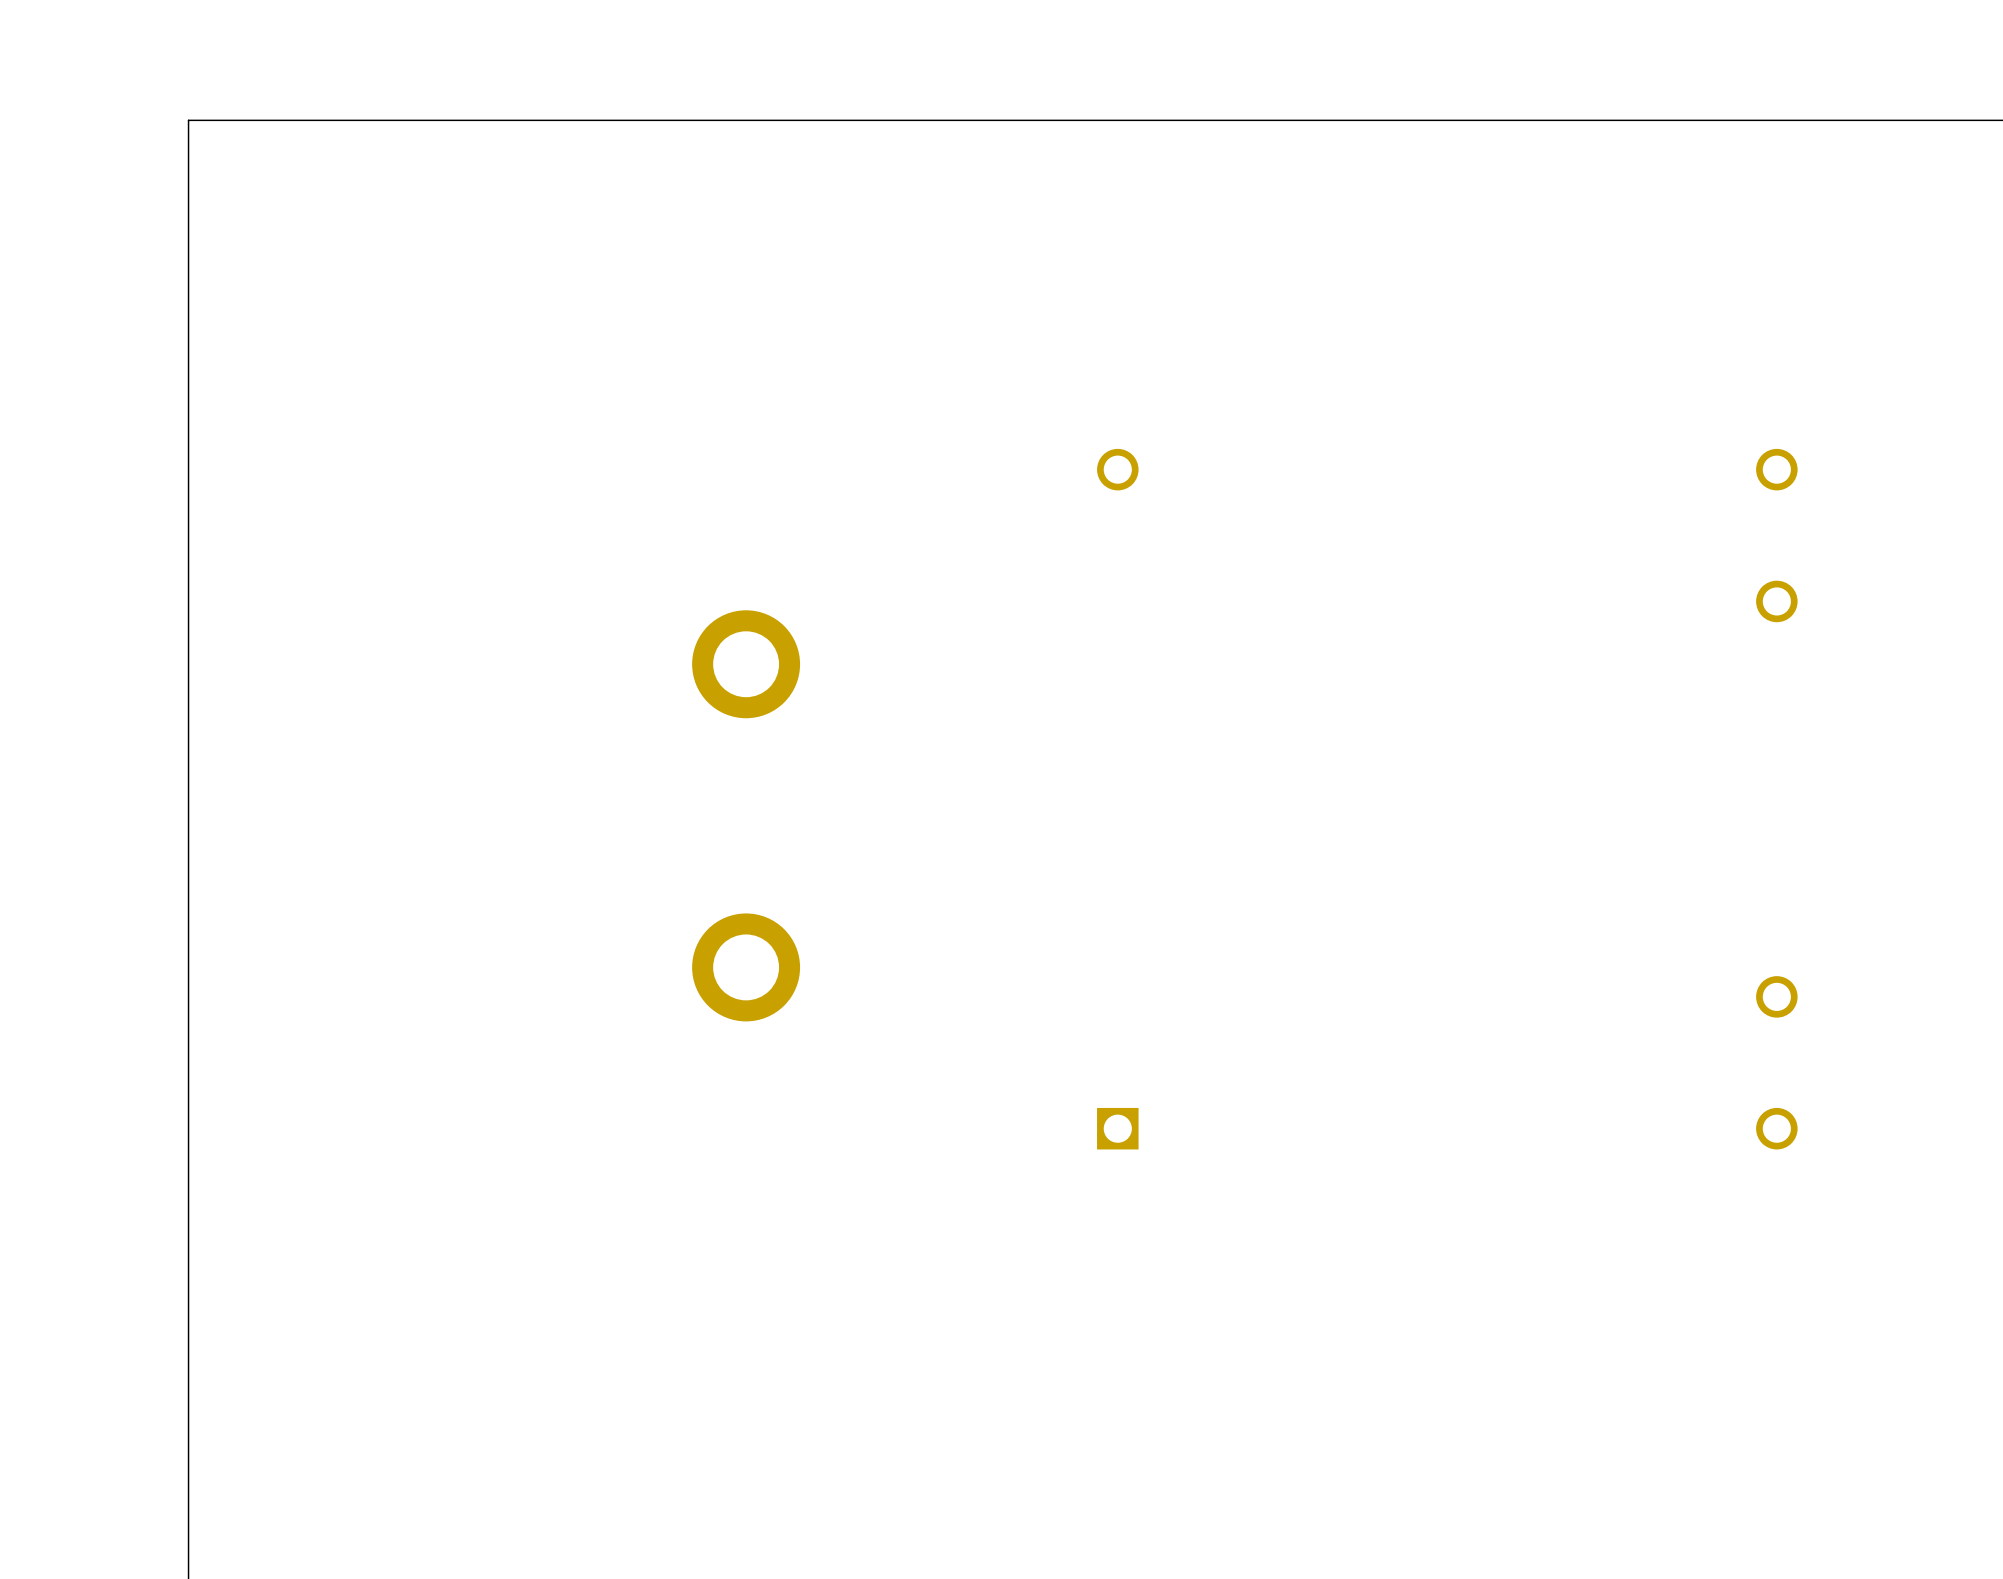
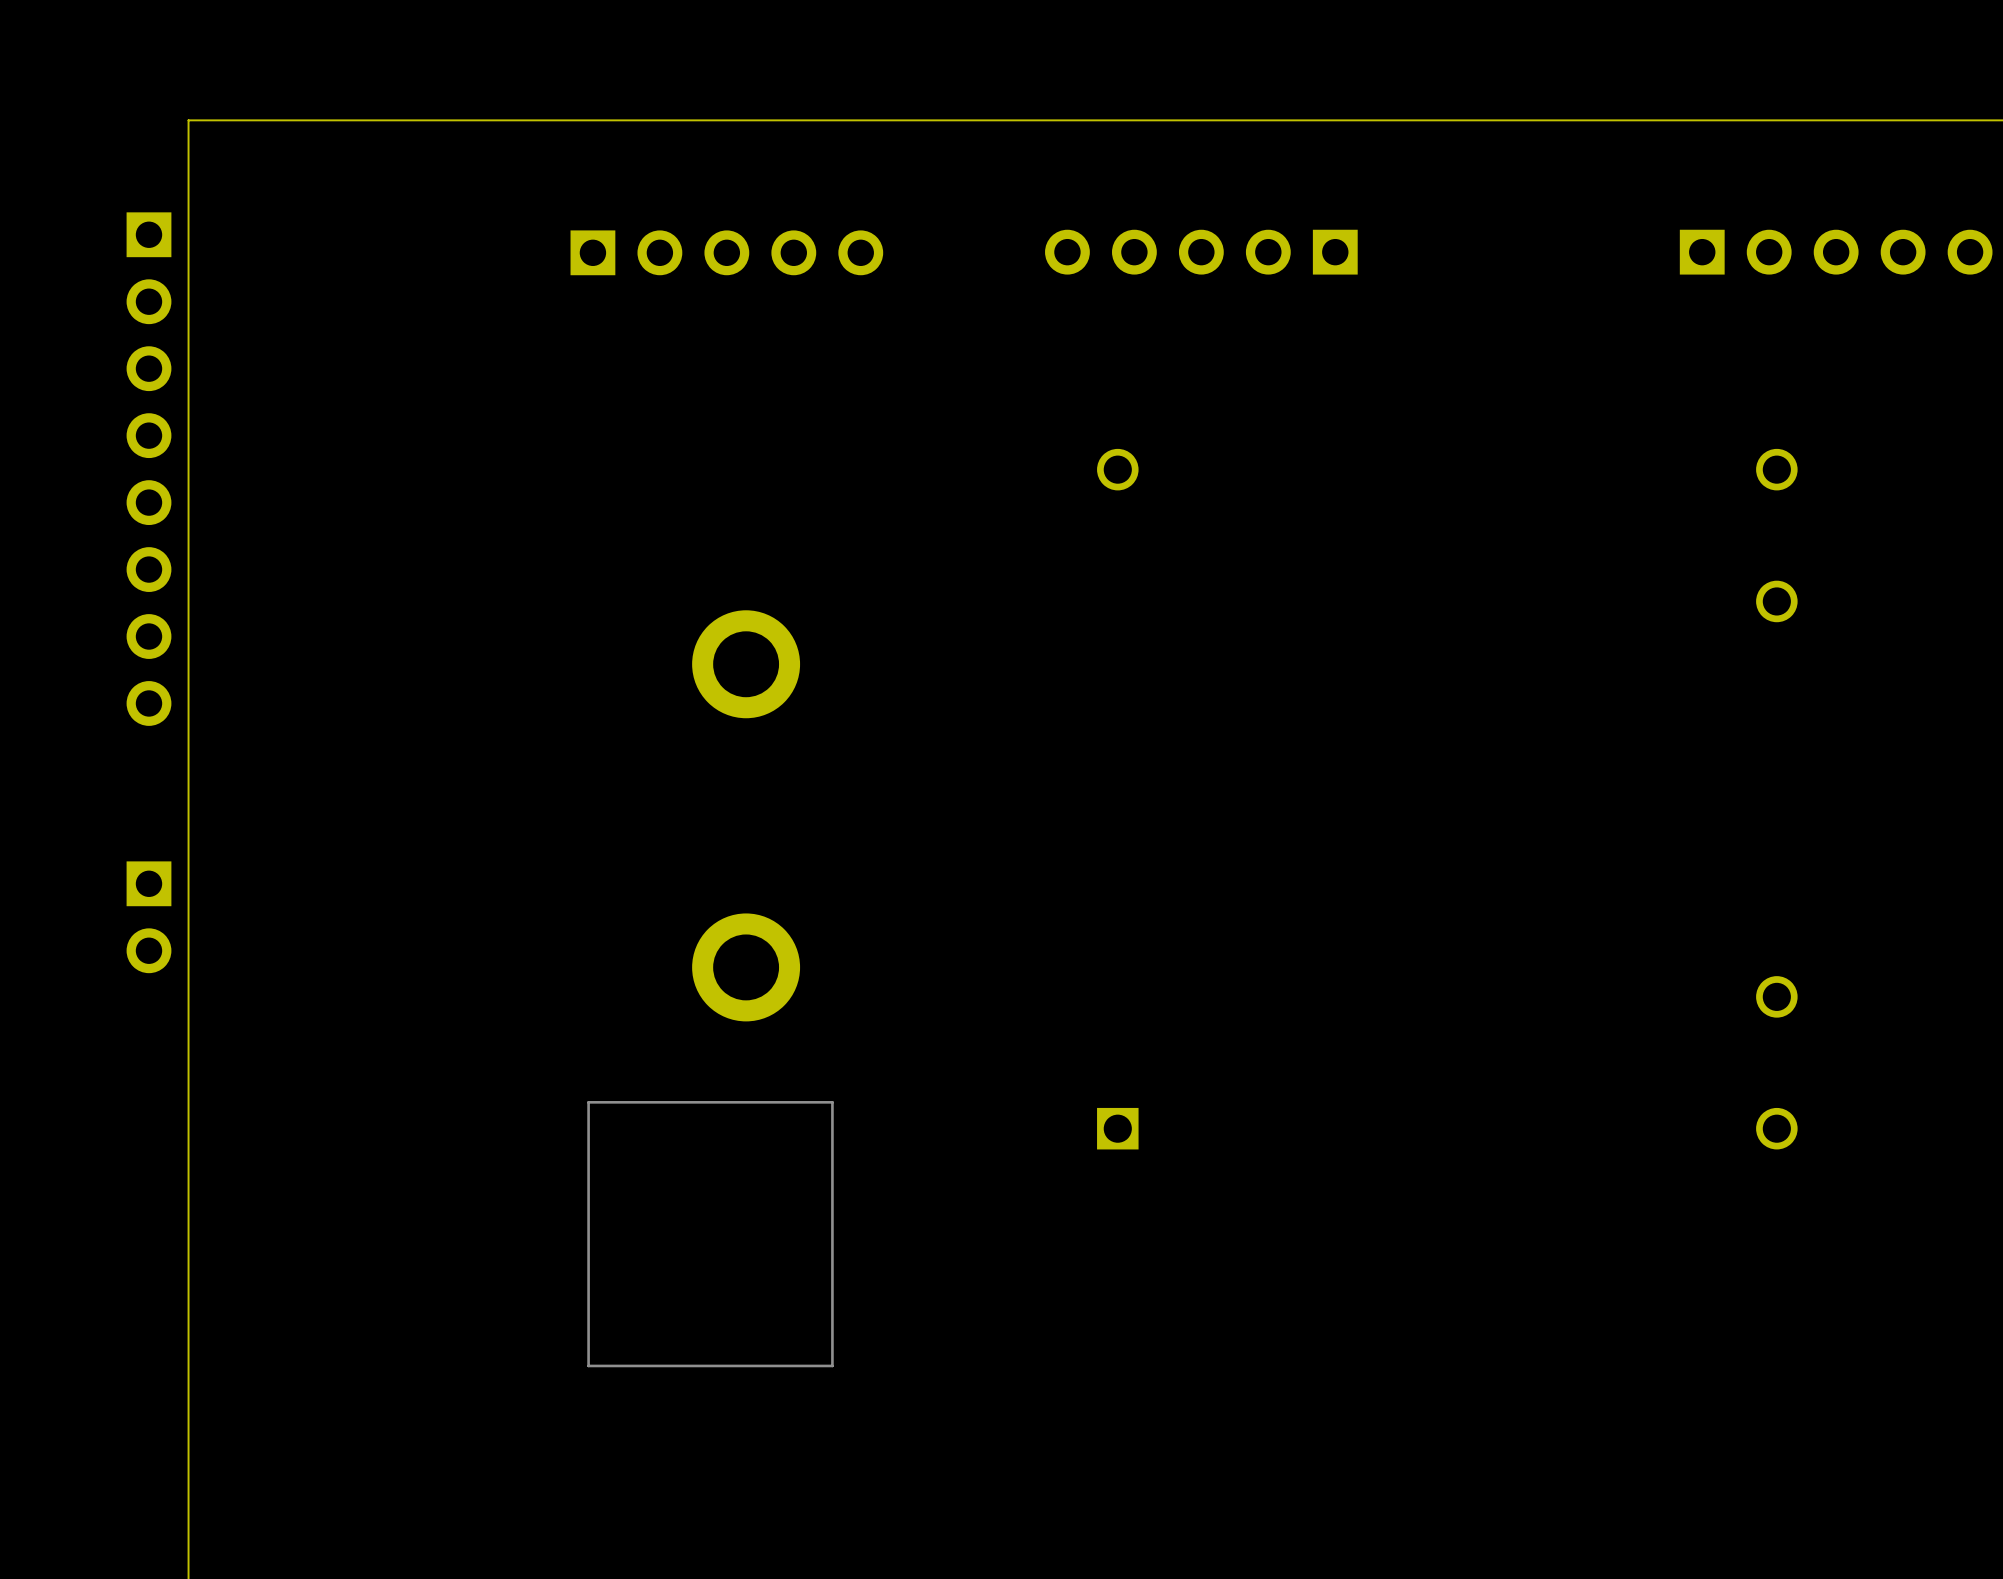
part: none -> (726, 252)
part: none -> (1201, 252)
part: none -> (1836, 252)
part: none -> (148, 469)
part: none -> (148, 917)
part: none -> (710, 1234)

